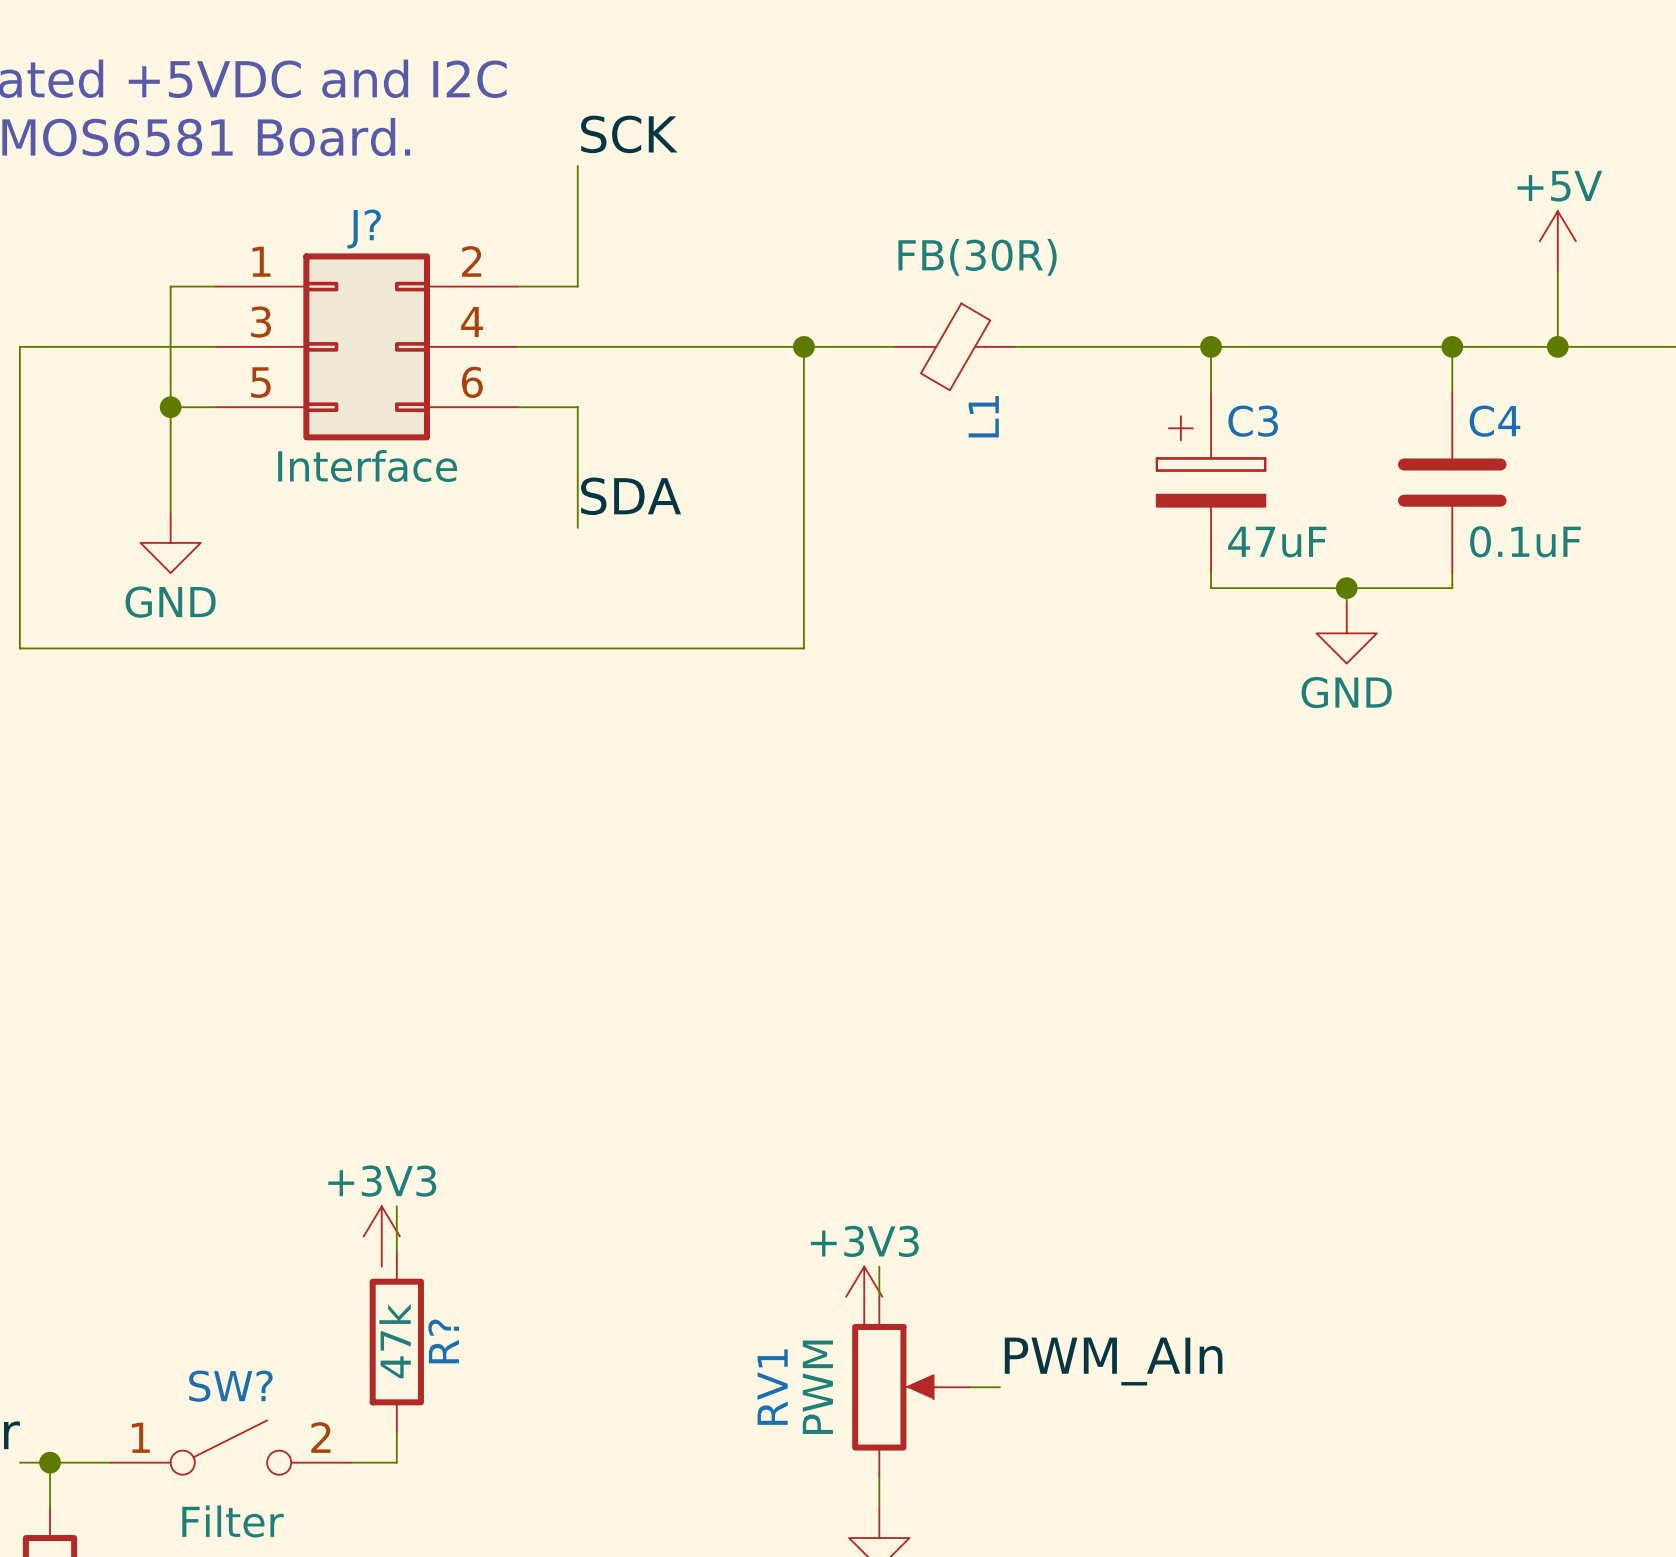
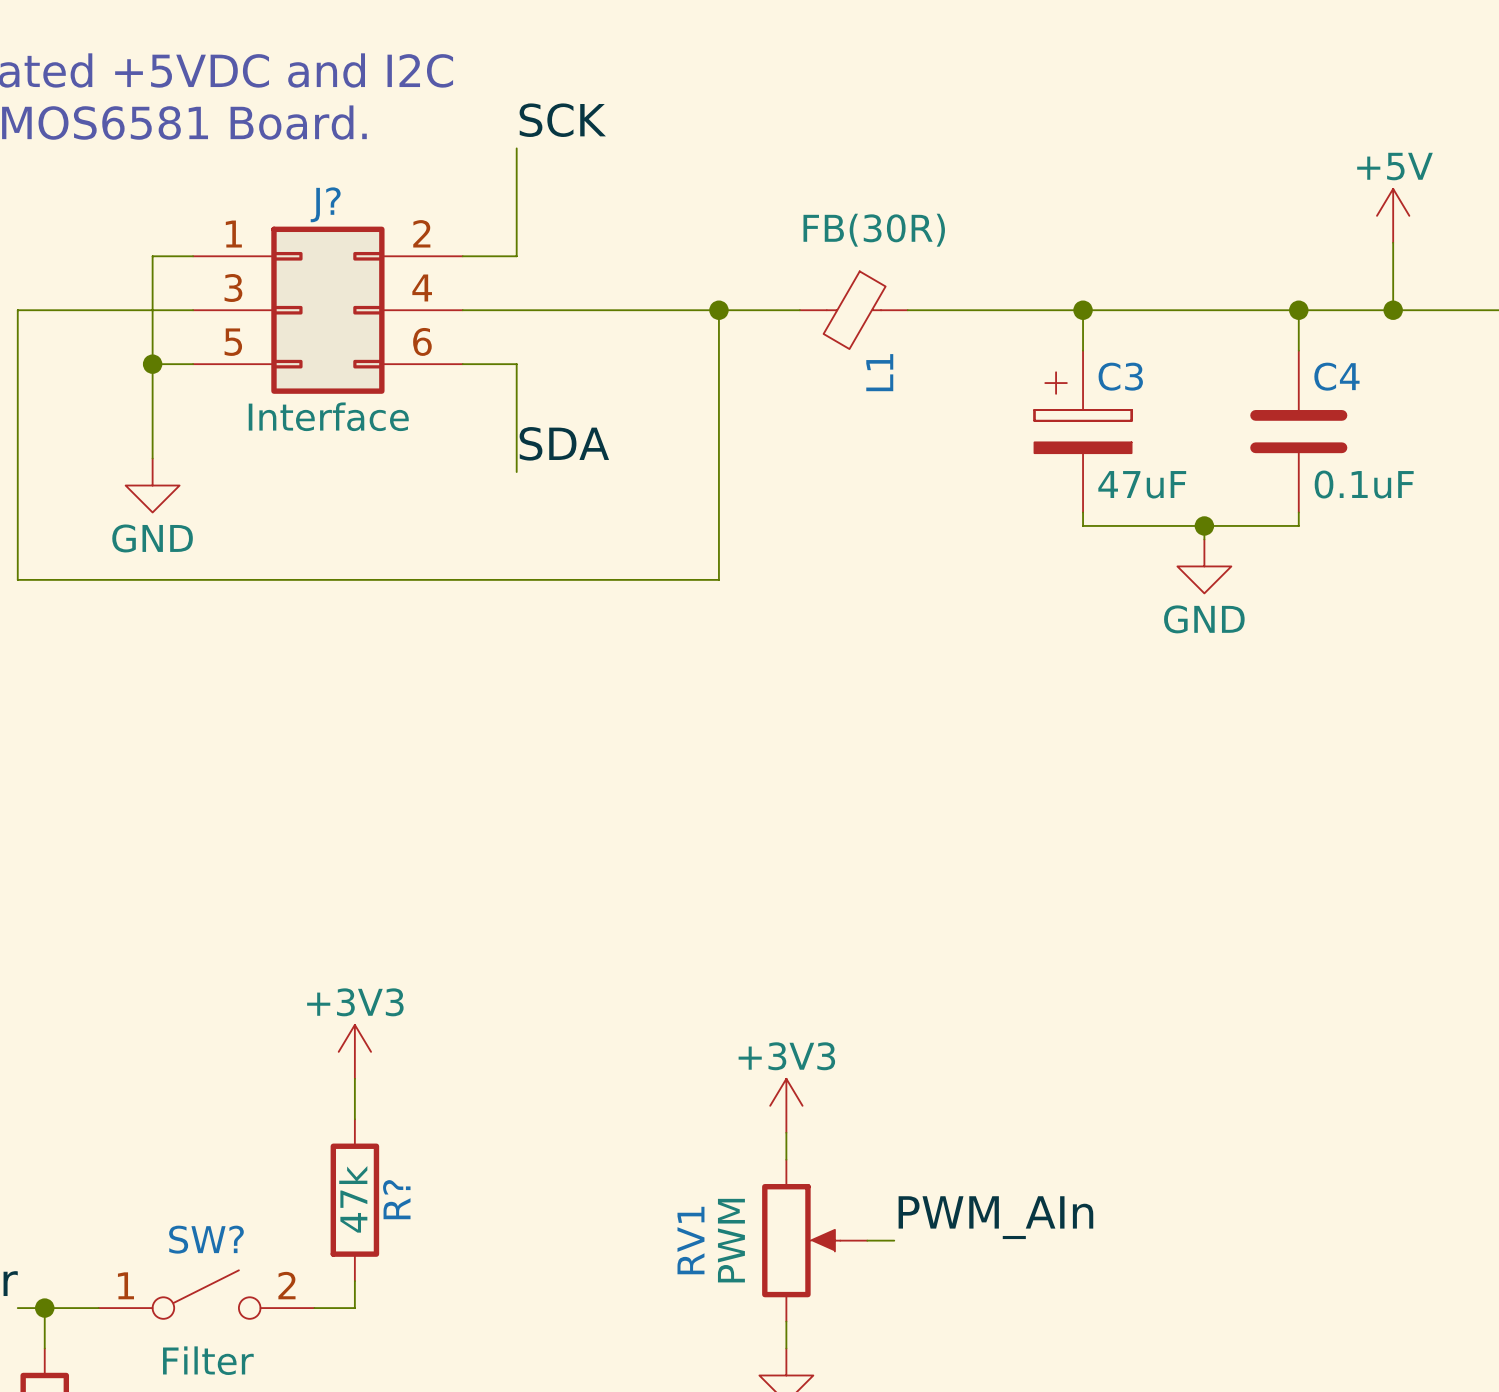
power symbol position: +3V3 (381, 1236) -> +3V3 (354, 1051)
power symbol position: +3V3 (864, 1296) -> +3V3 (786, 1105)

